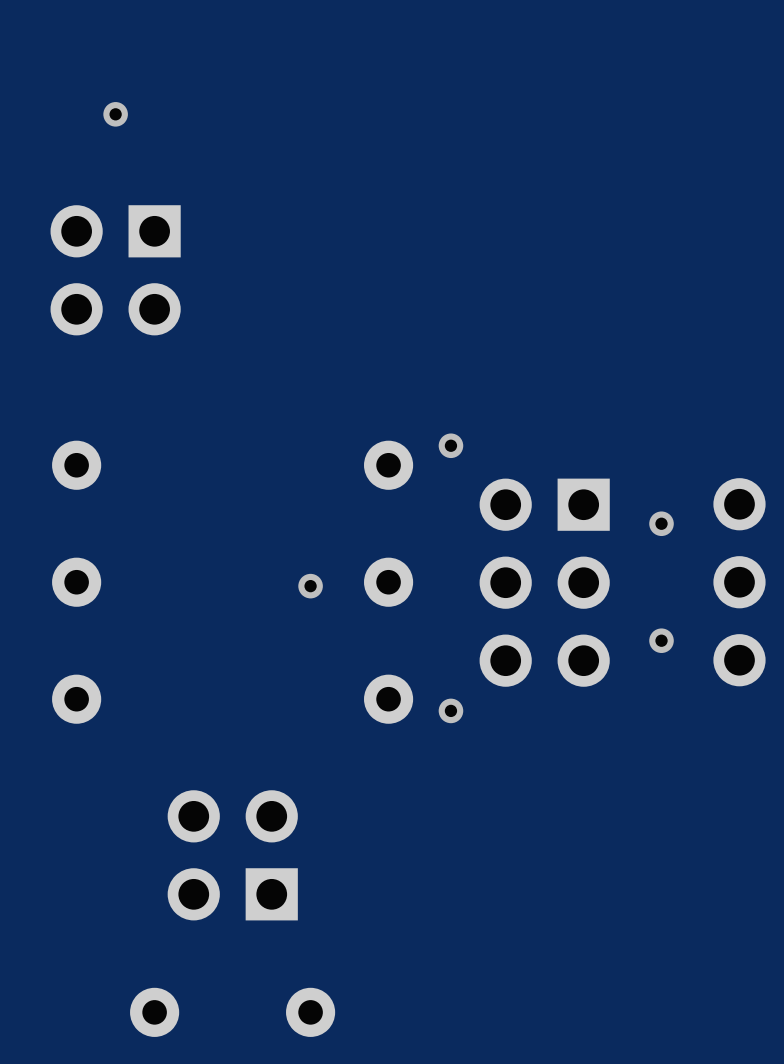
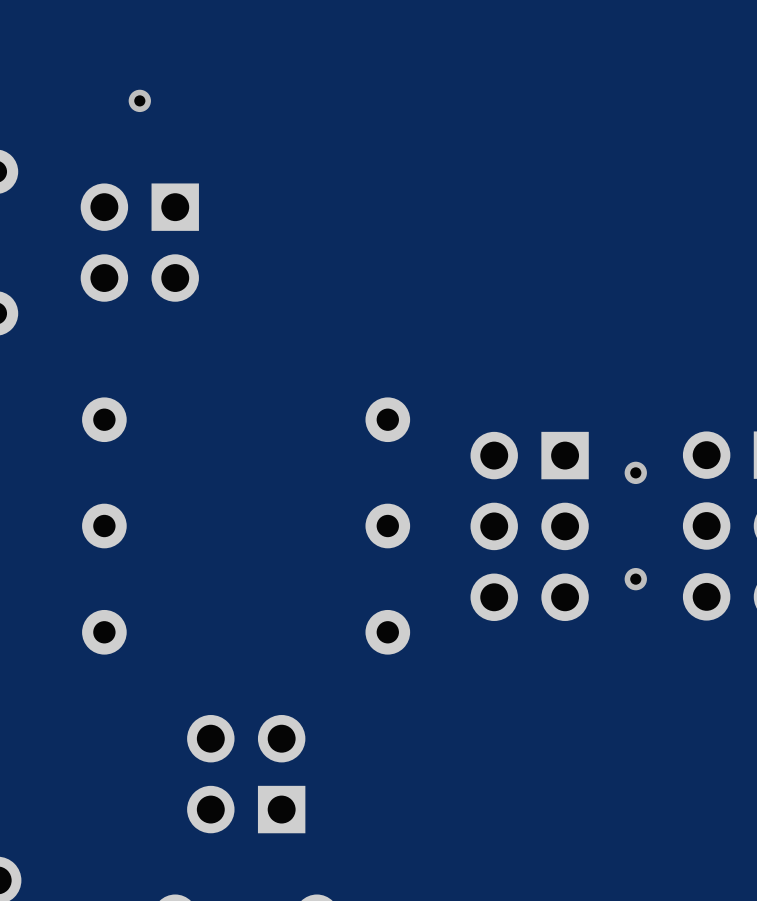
via: (450, 445) -> none
via: (310, 586) -> none
via: (450, 710) -> none

